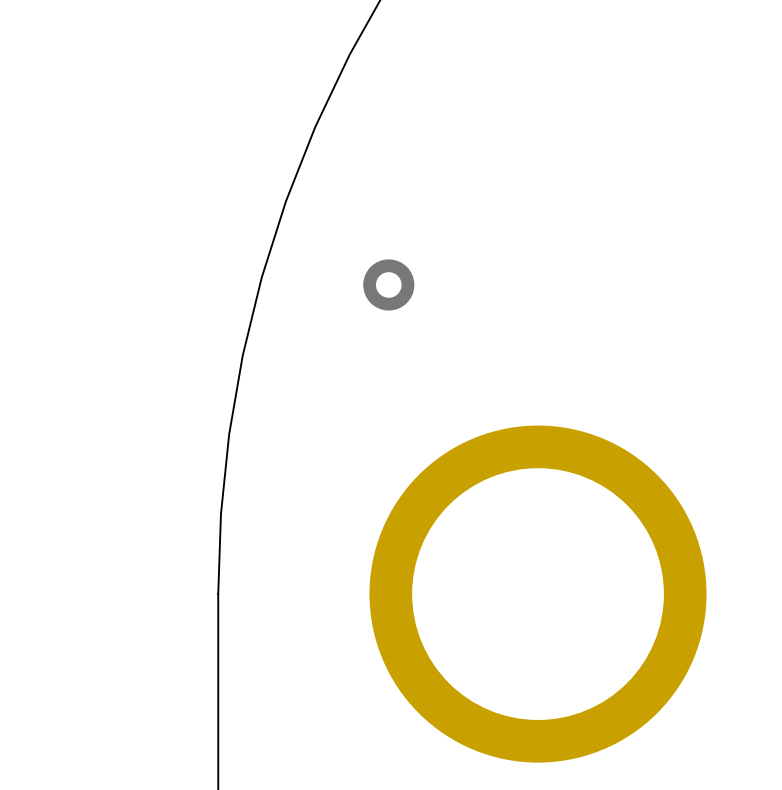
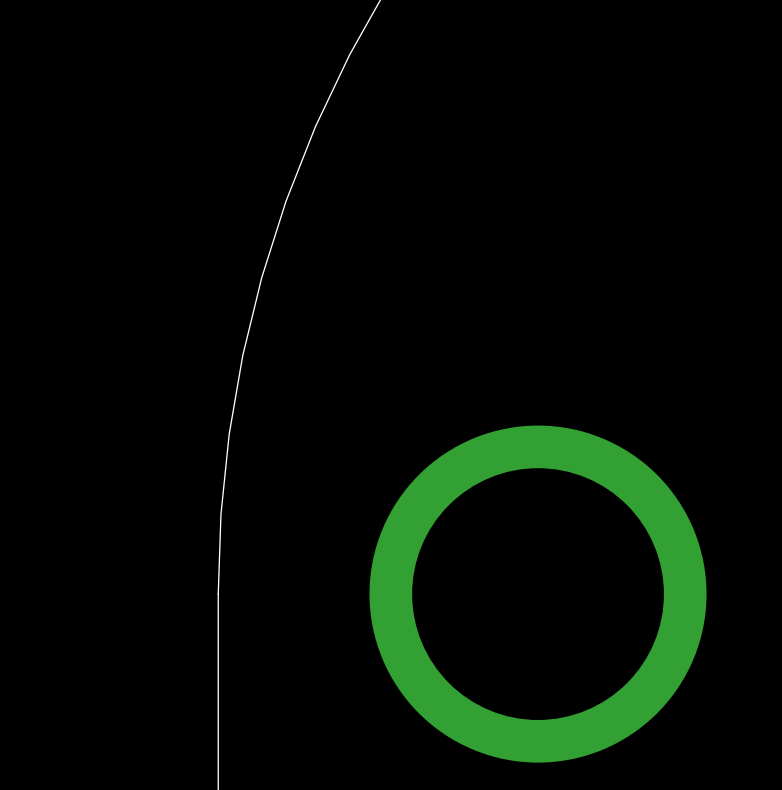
via: (388, 284) -> none

